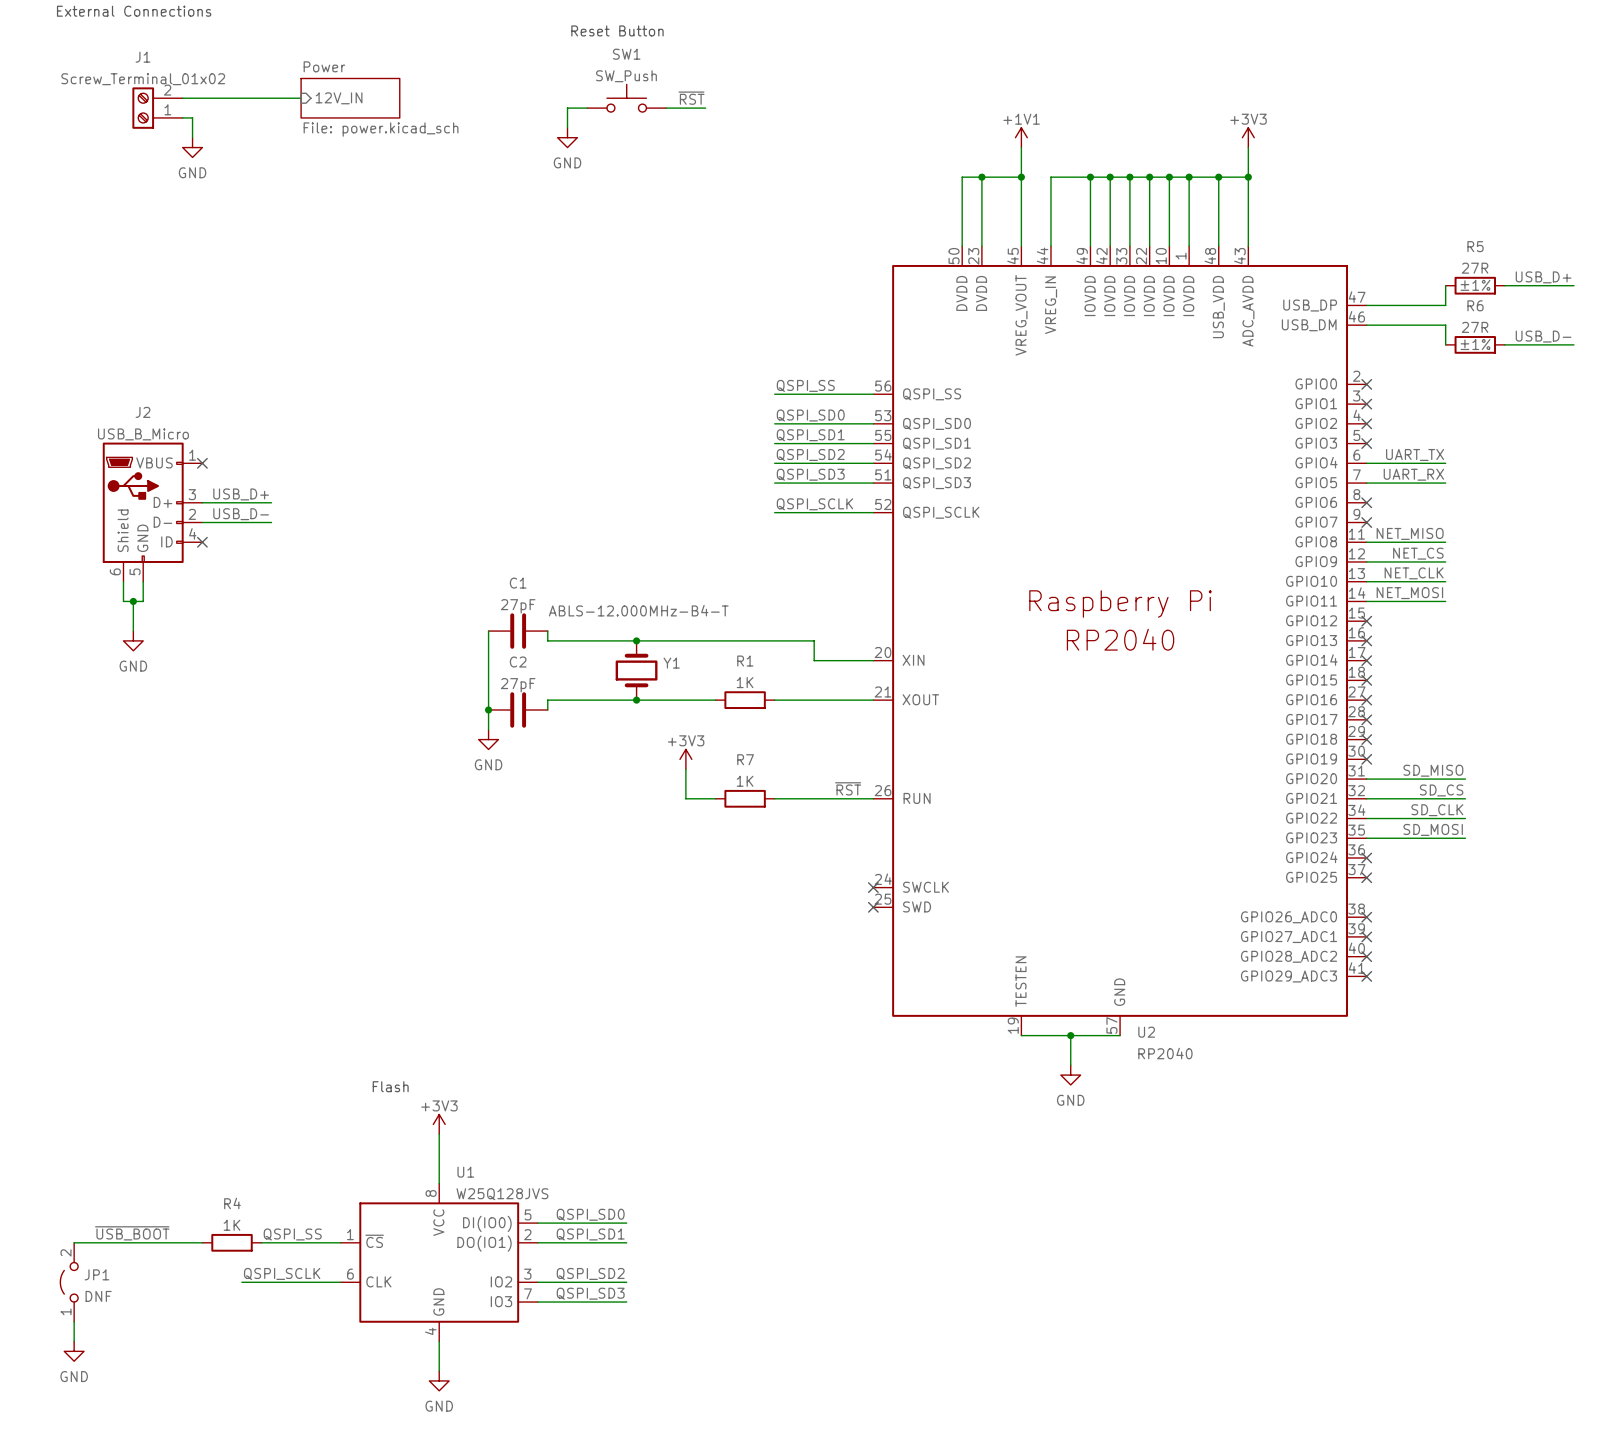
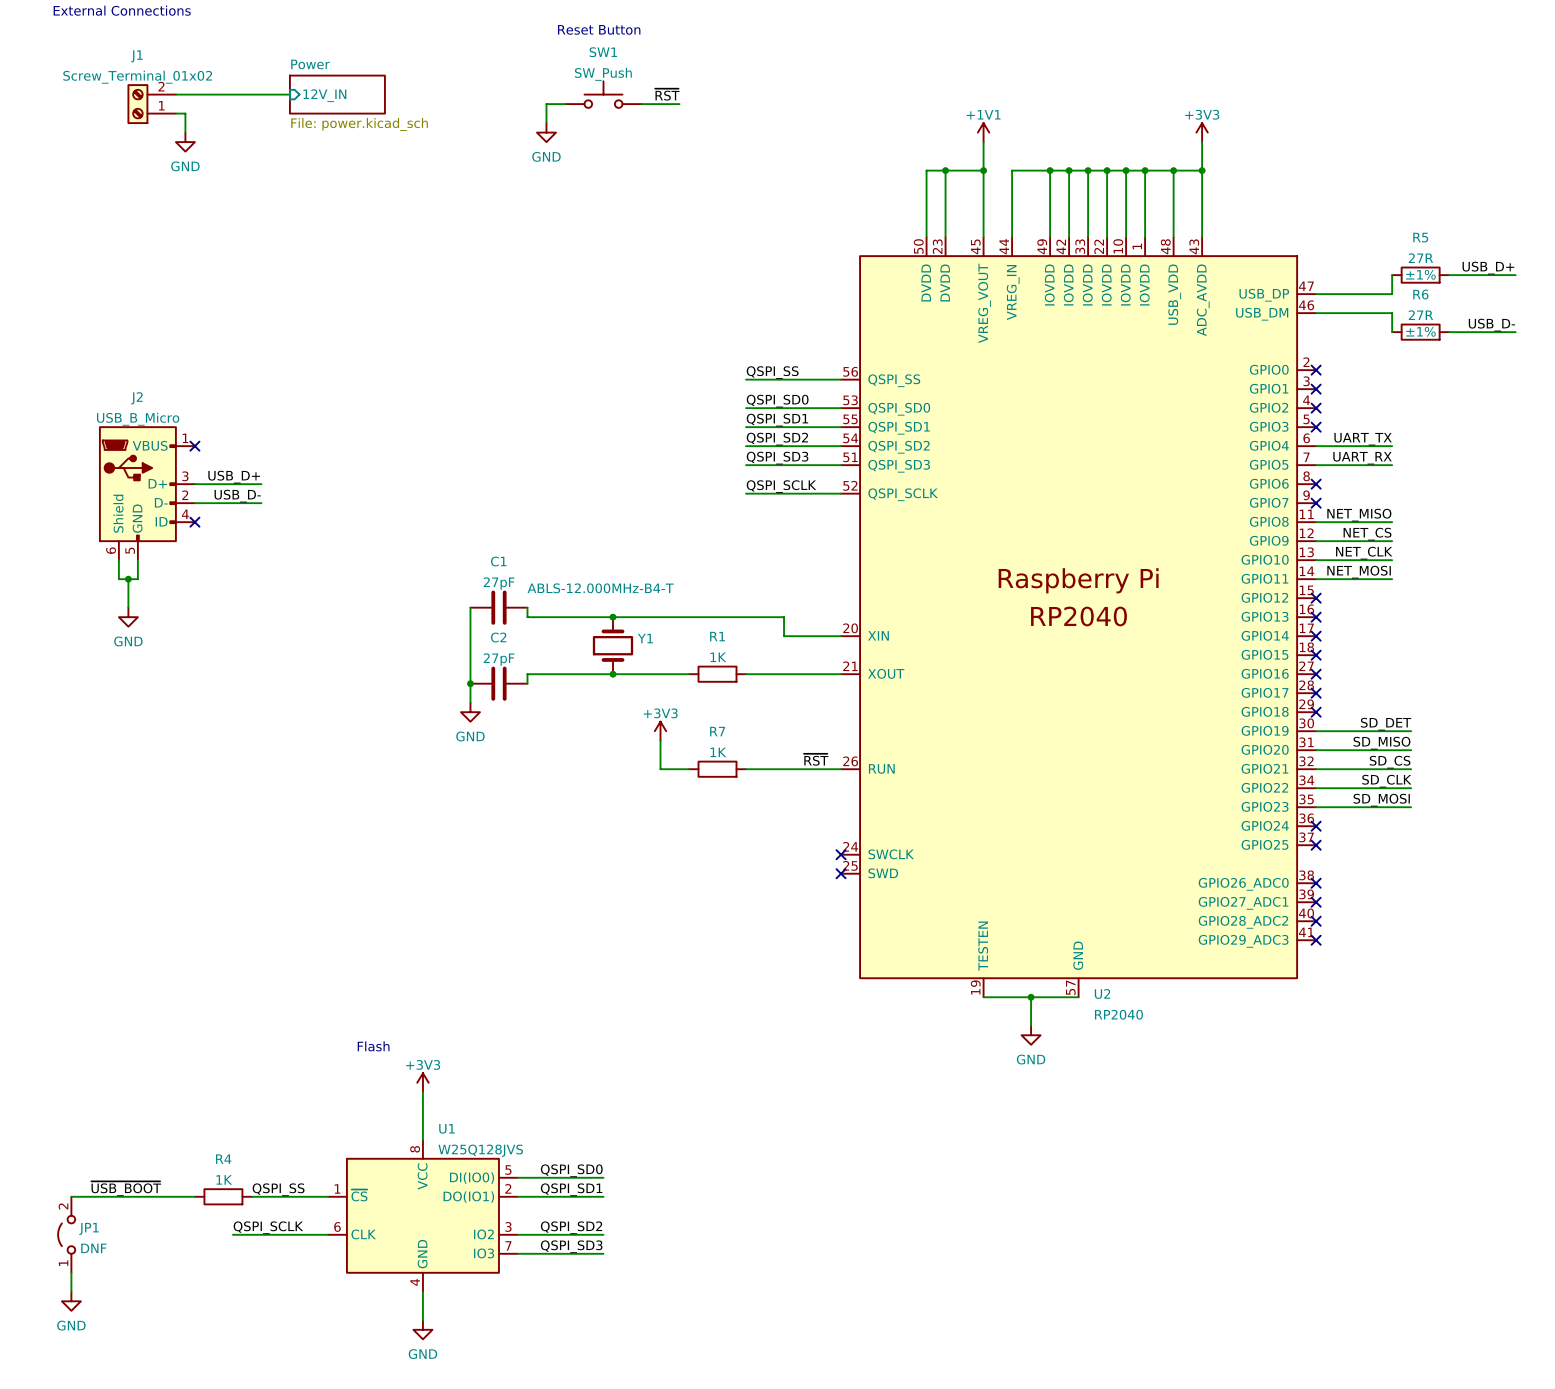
label: none -> SD_DET (1386, 724)
wire: none -> (1316, 731) (1411, 731)
no-connect mark: (1366, 759) -> none

